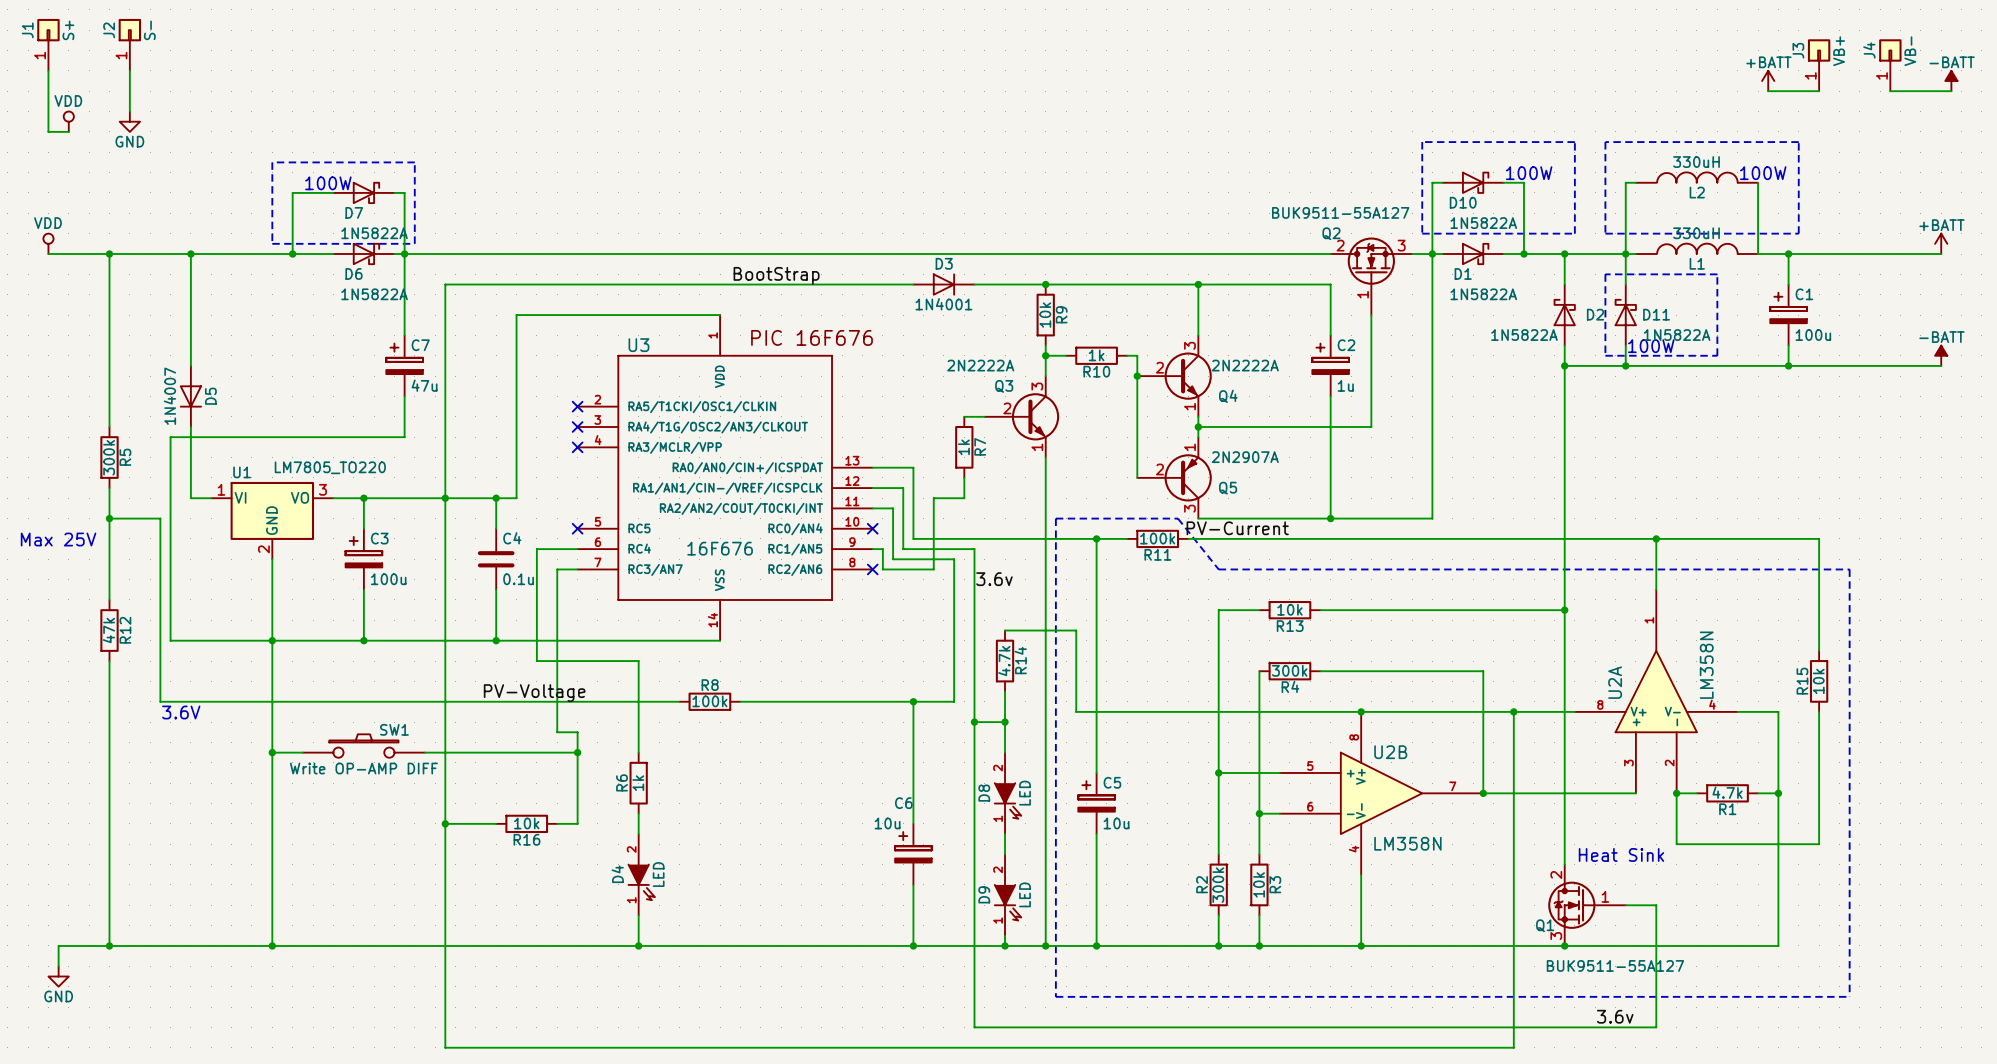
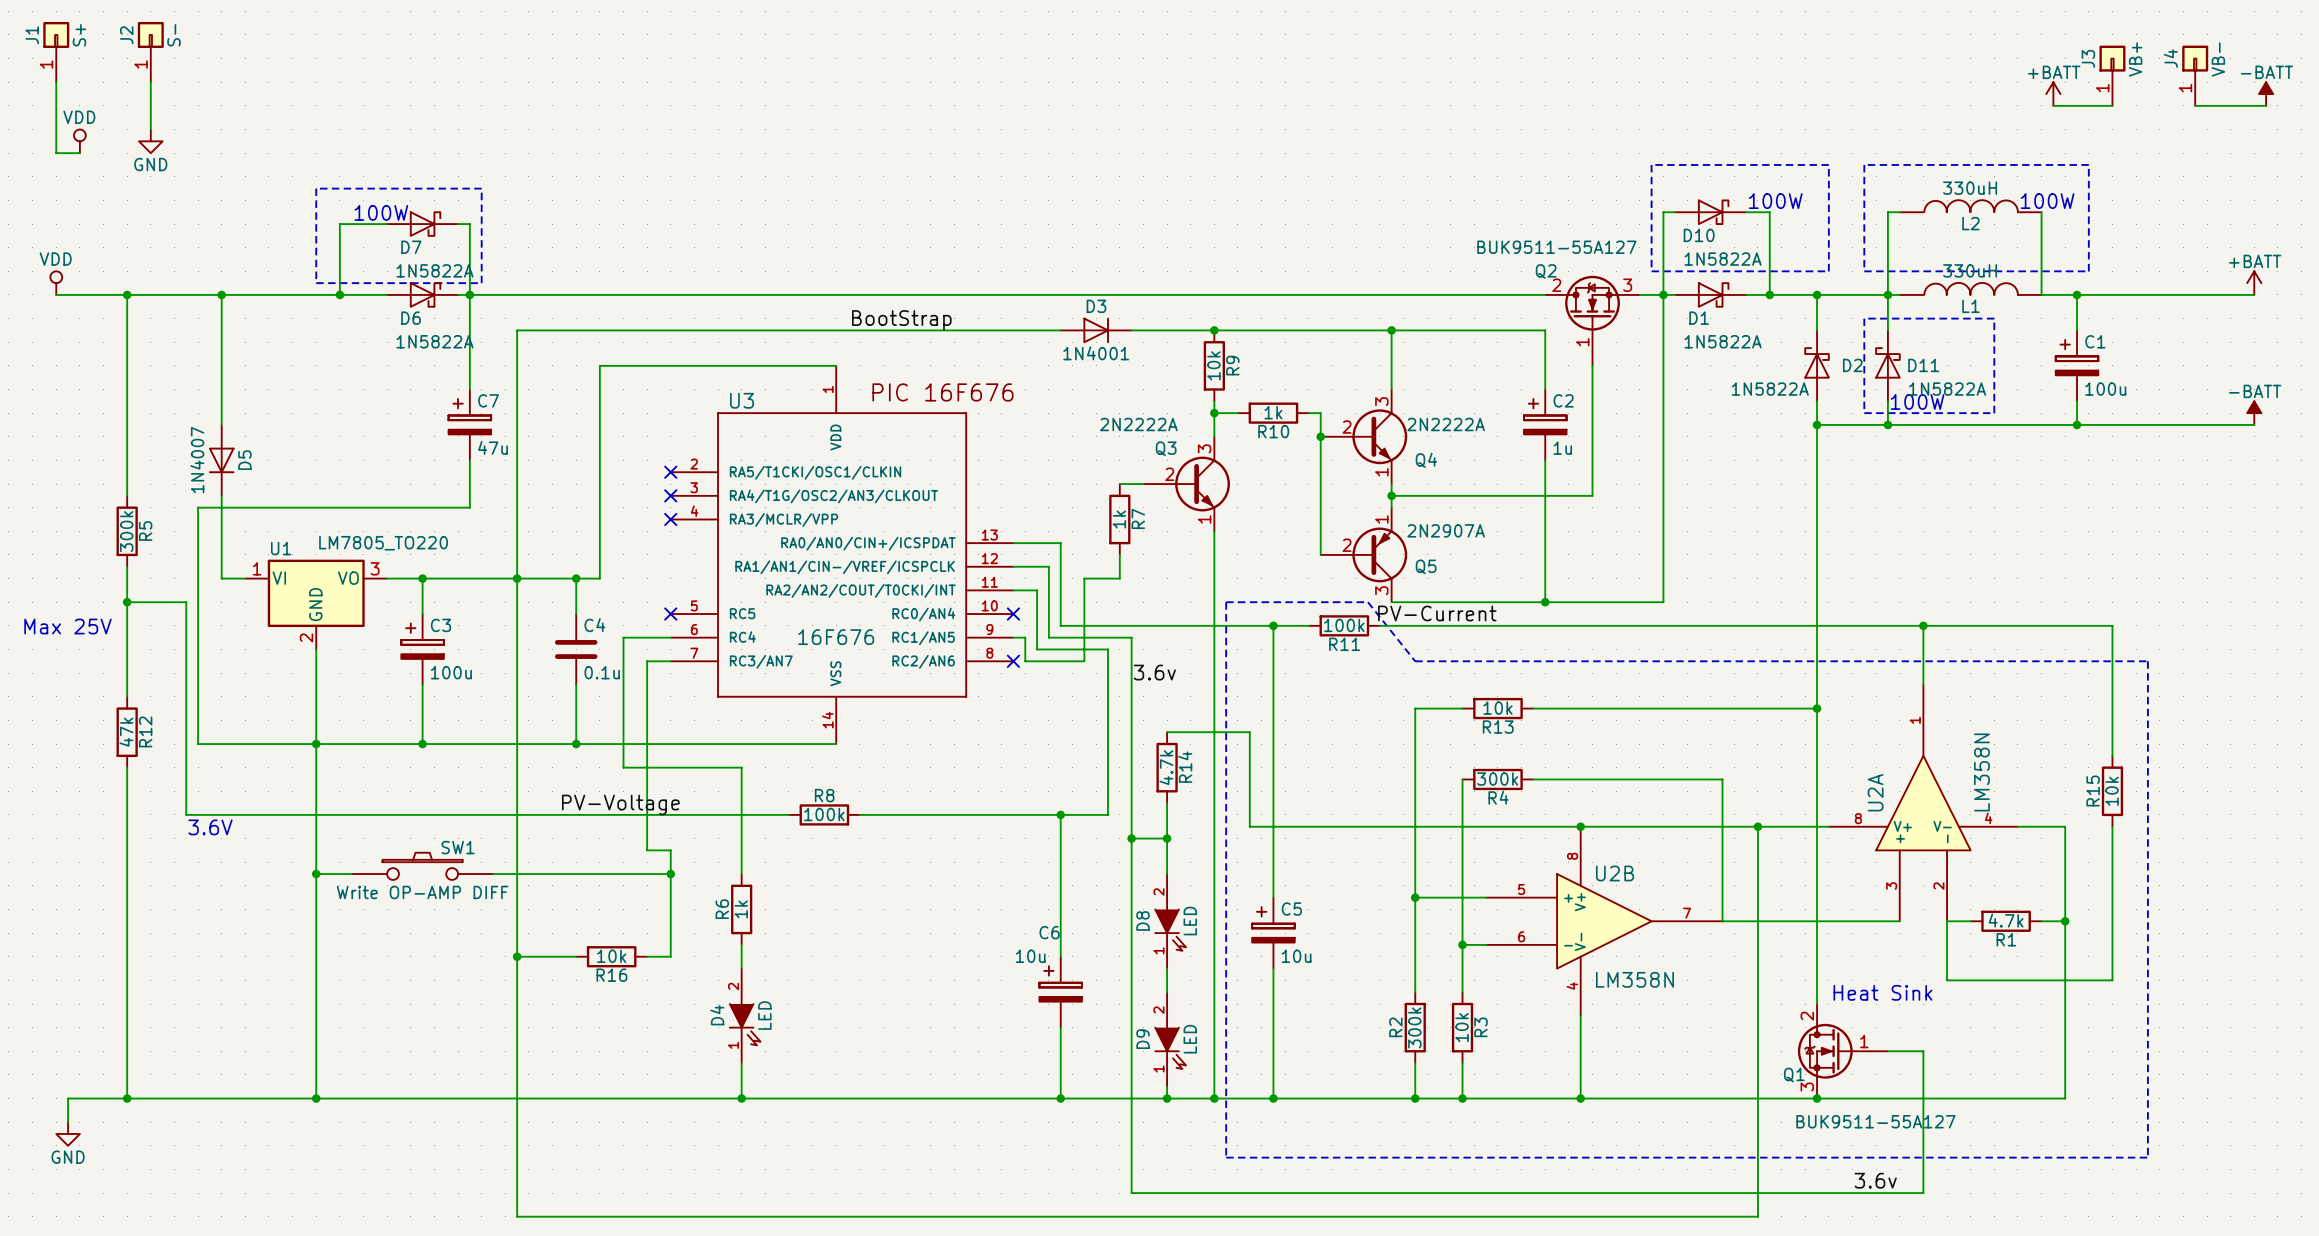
junction: (1483, 793) -> none
junction: (1676, 793) -> none

